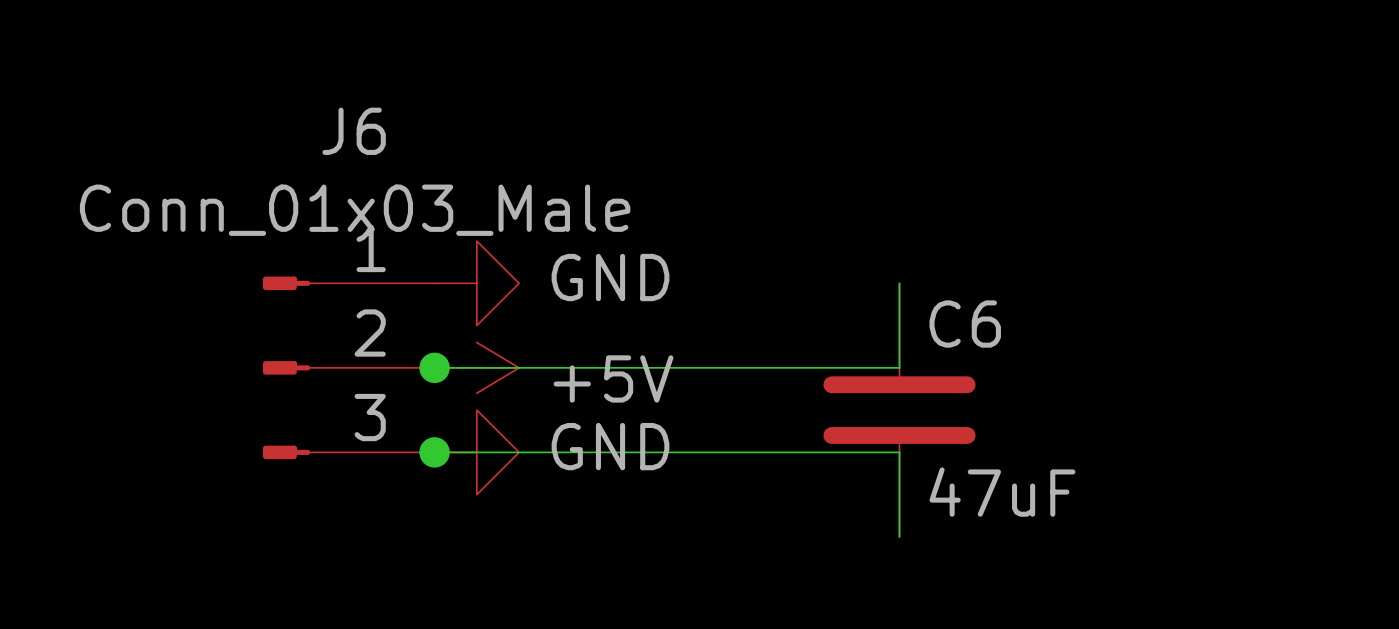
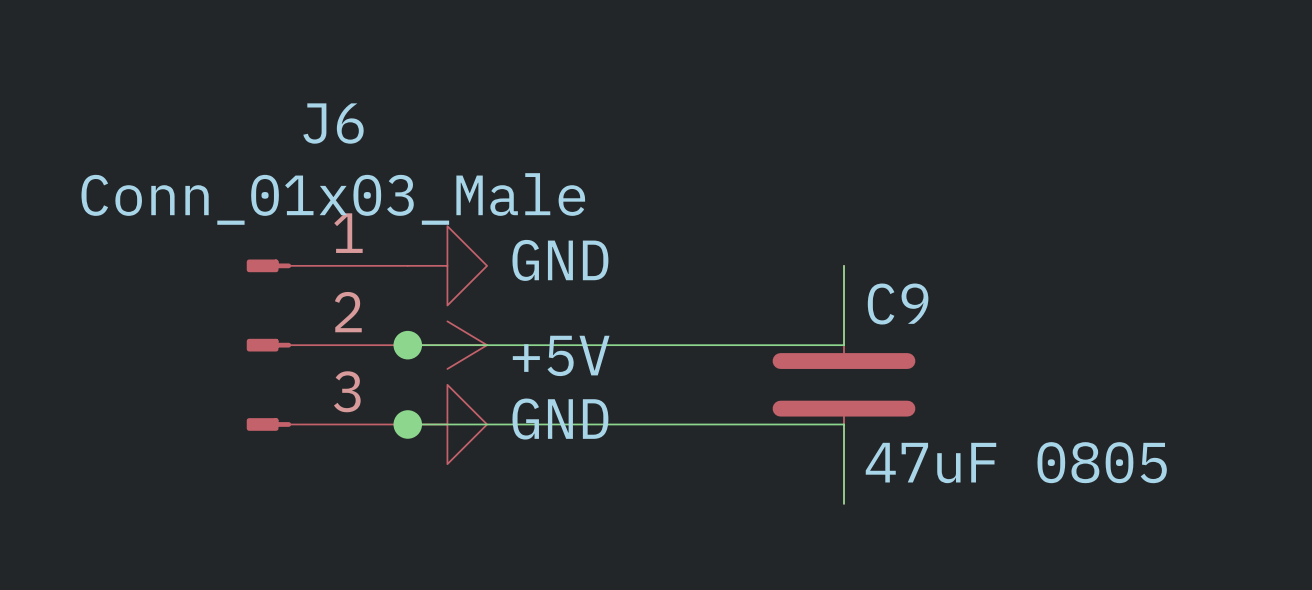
C6 name: C6 (965, 324) -> C9 (898, 304)
C6 value: 47uF (1002, 492) -> 47uF 0805 (1016, 462)

